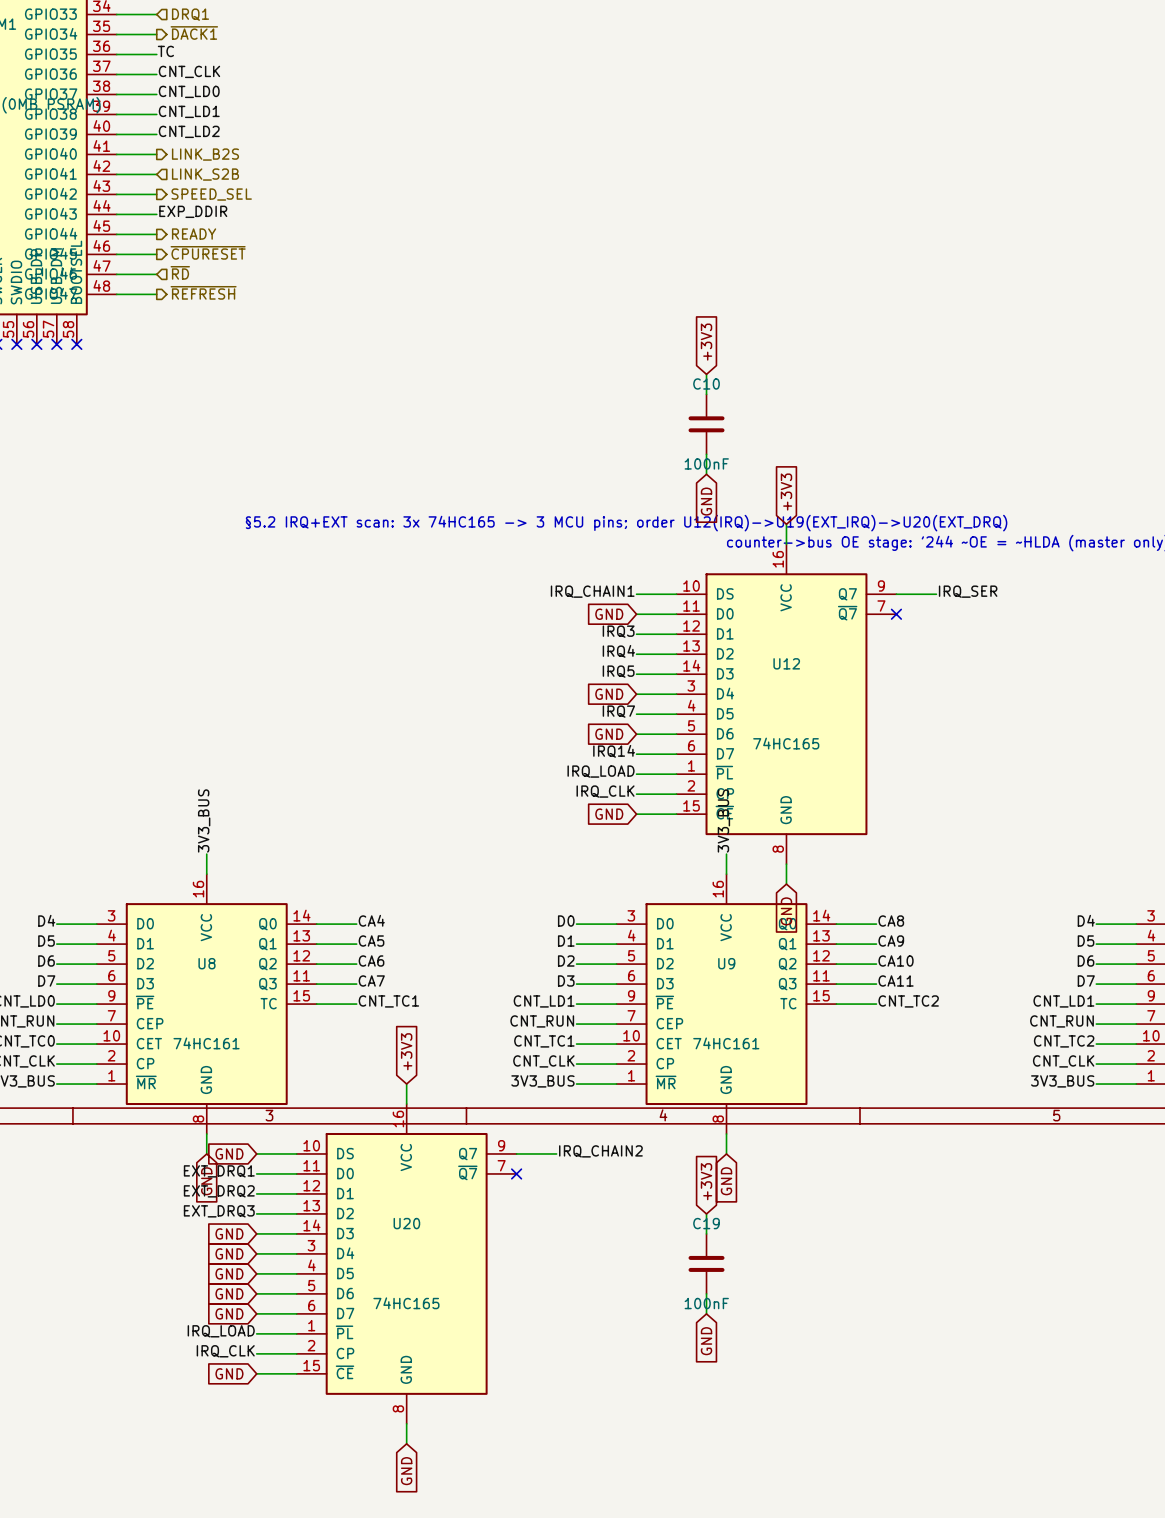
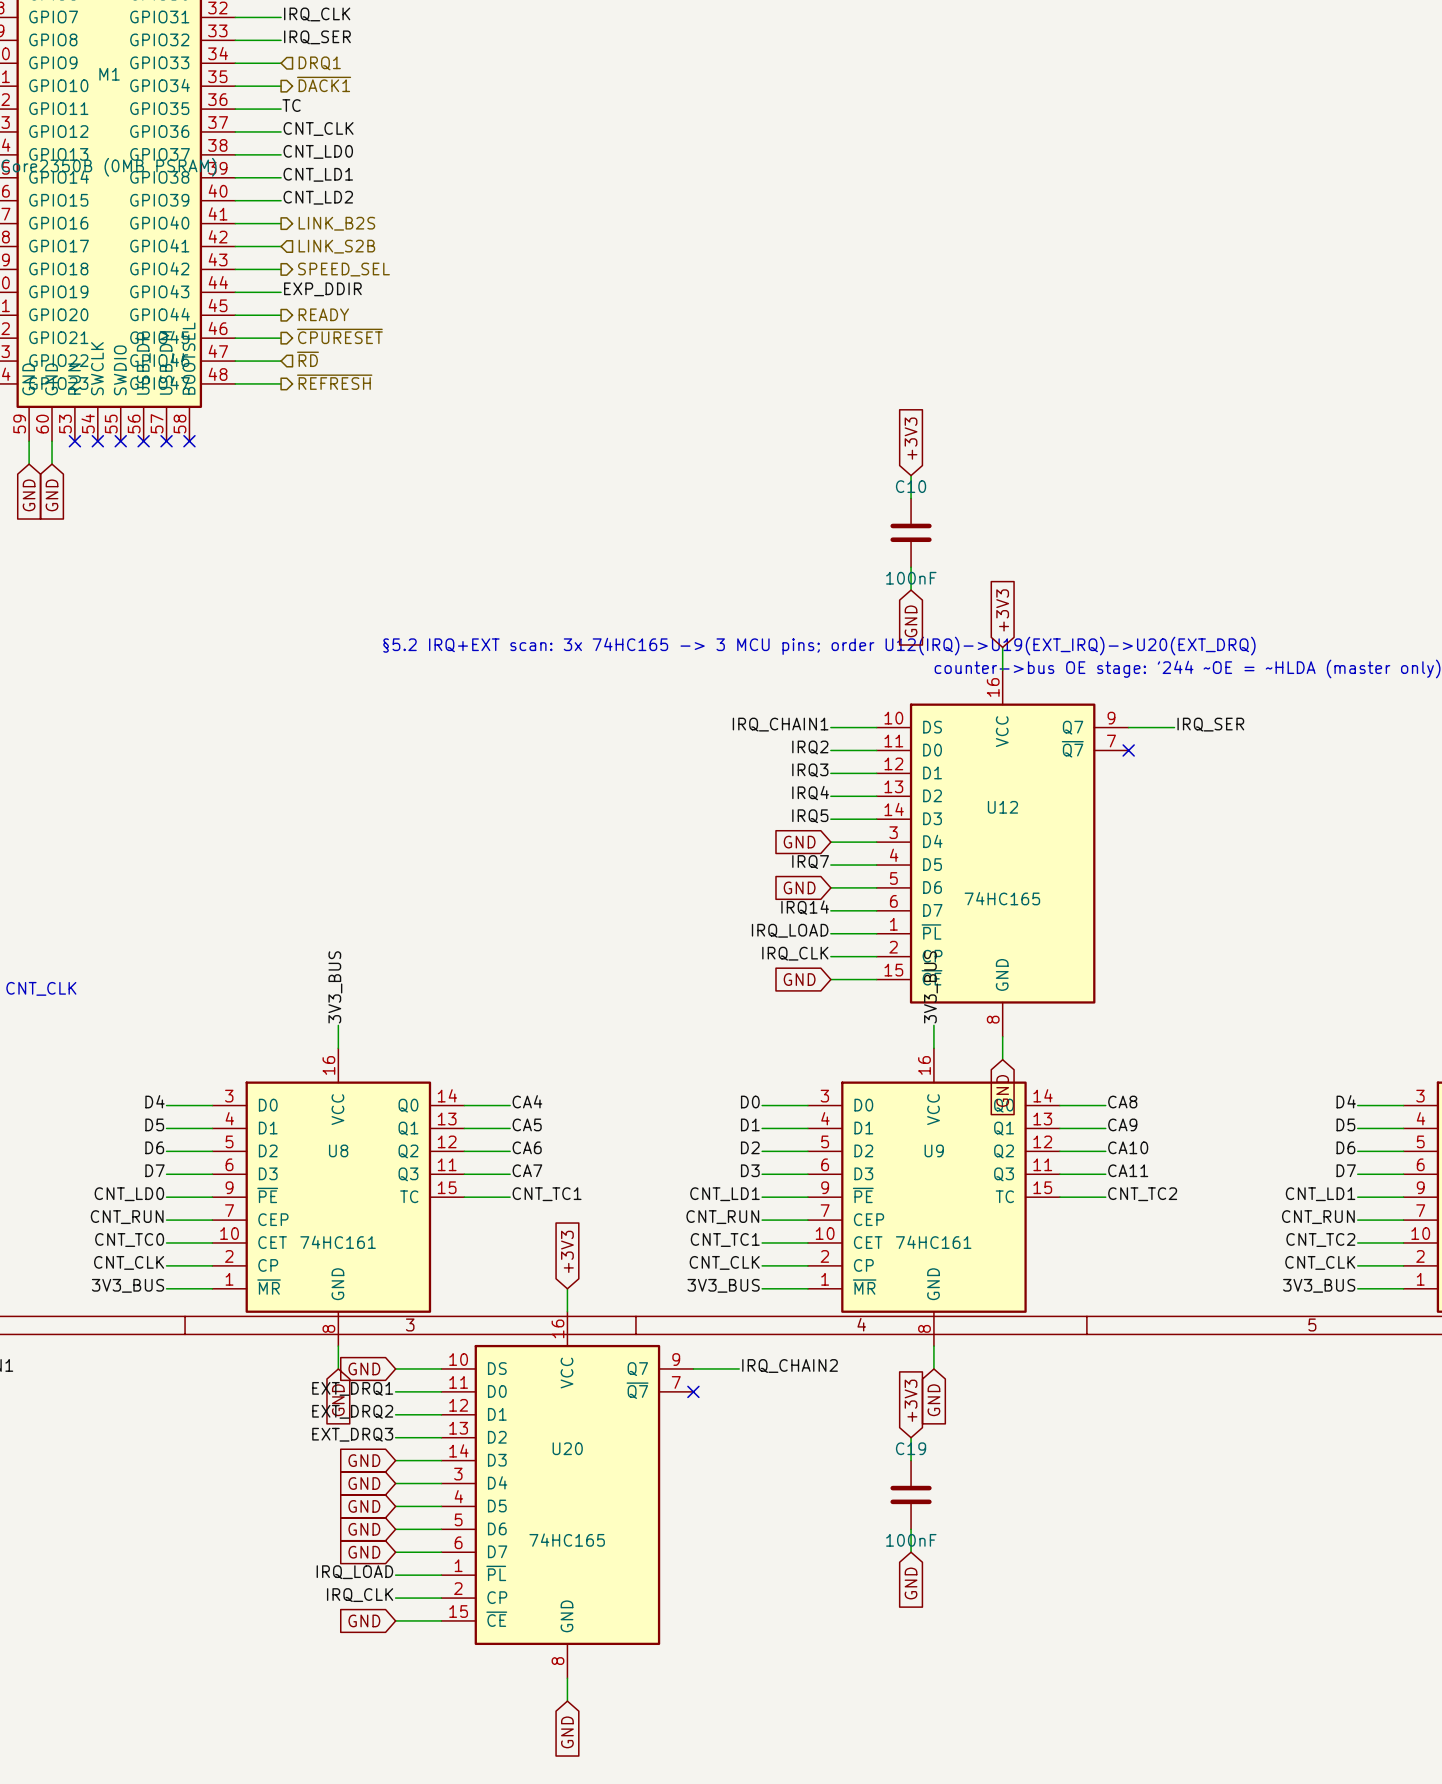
label: none -> IRQ2 (810, 747)
global label: GND (609, 614) -> none

